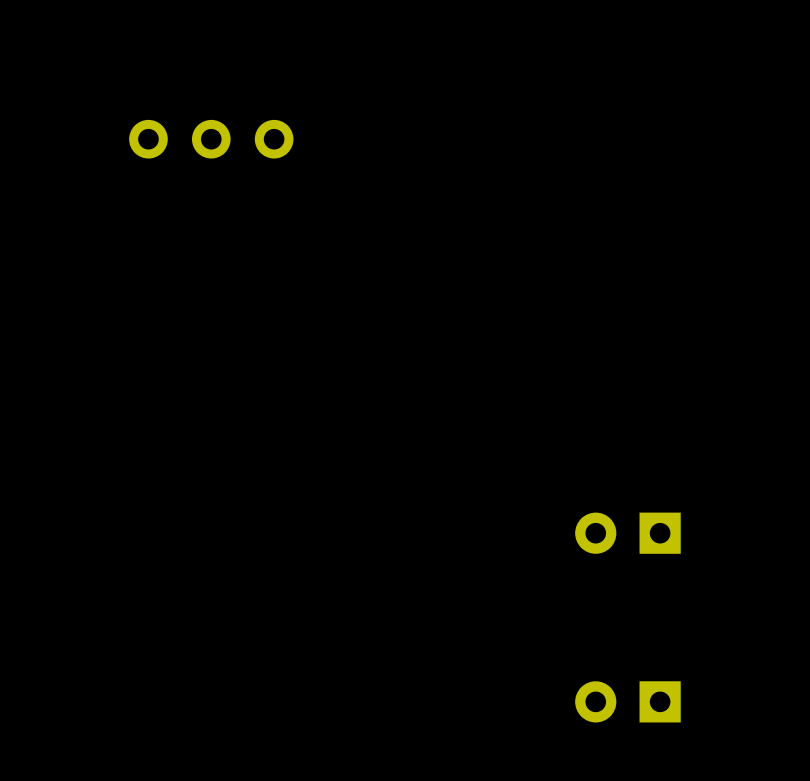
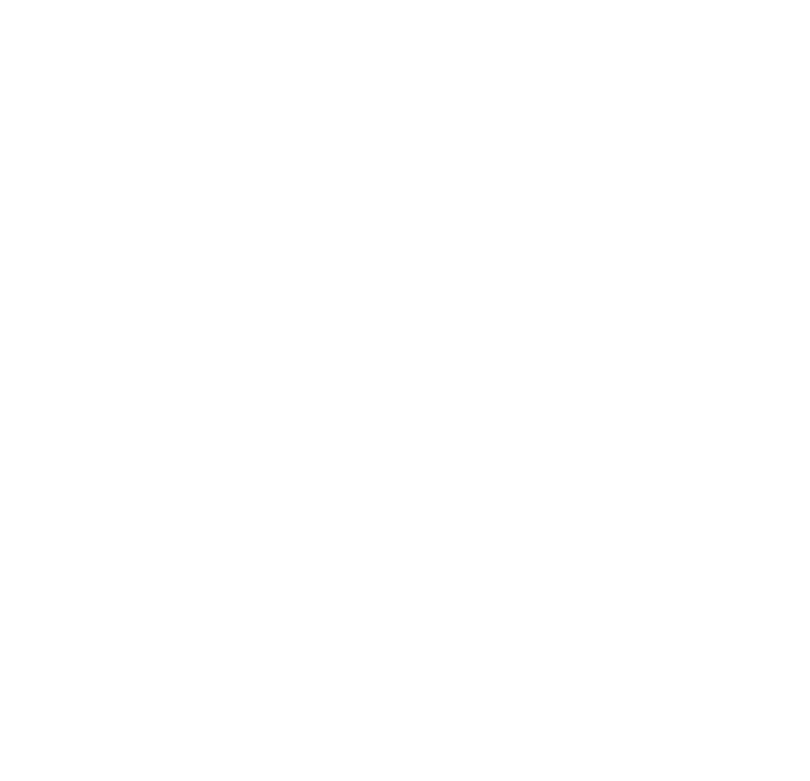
part: (211, 139) -> none
part: (627, 533) -> none
part: (627, 701) -> none

